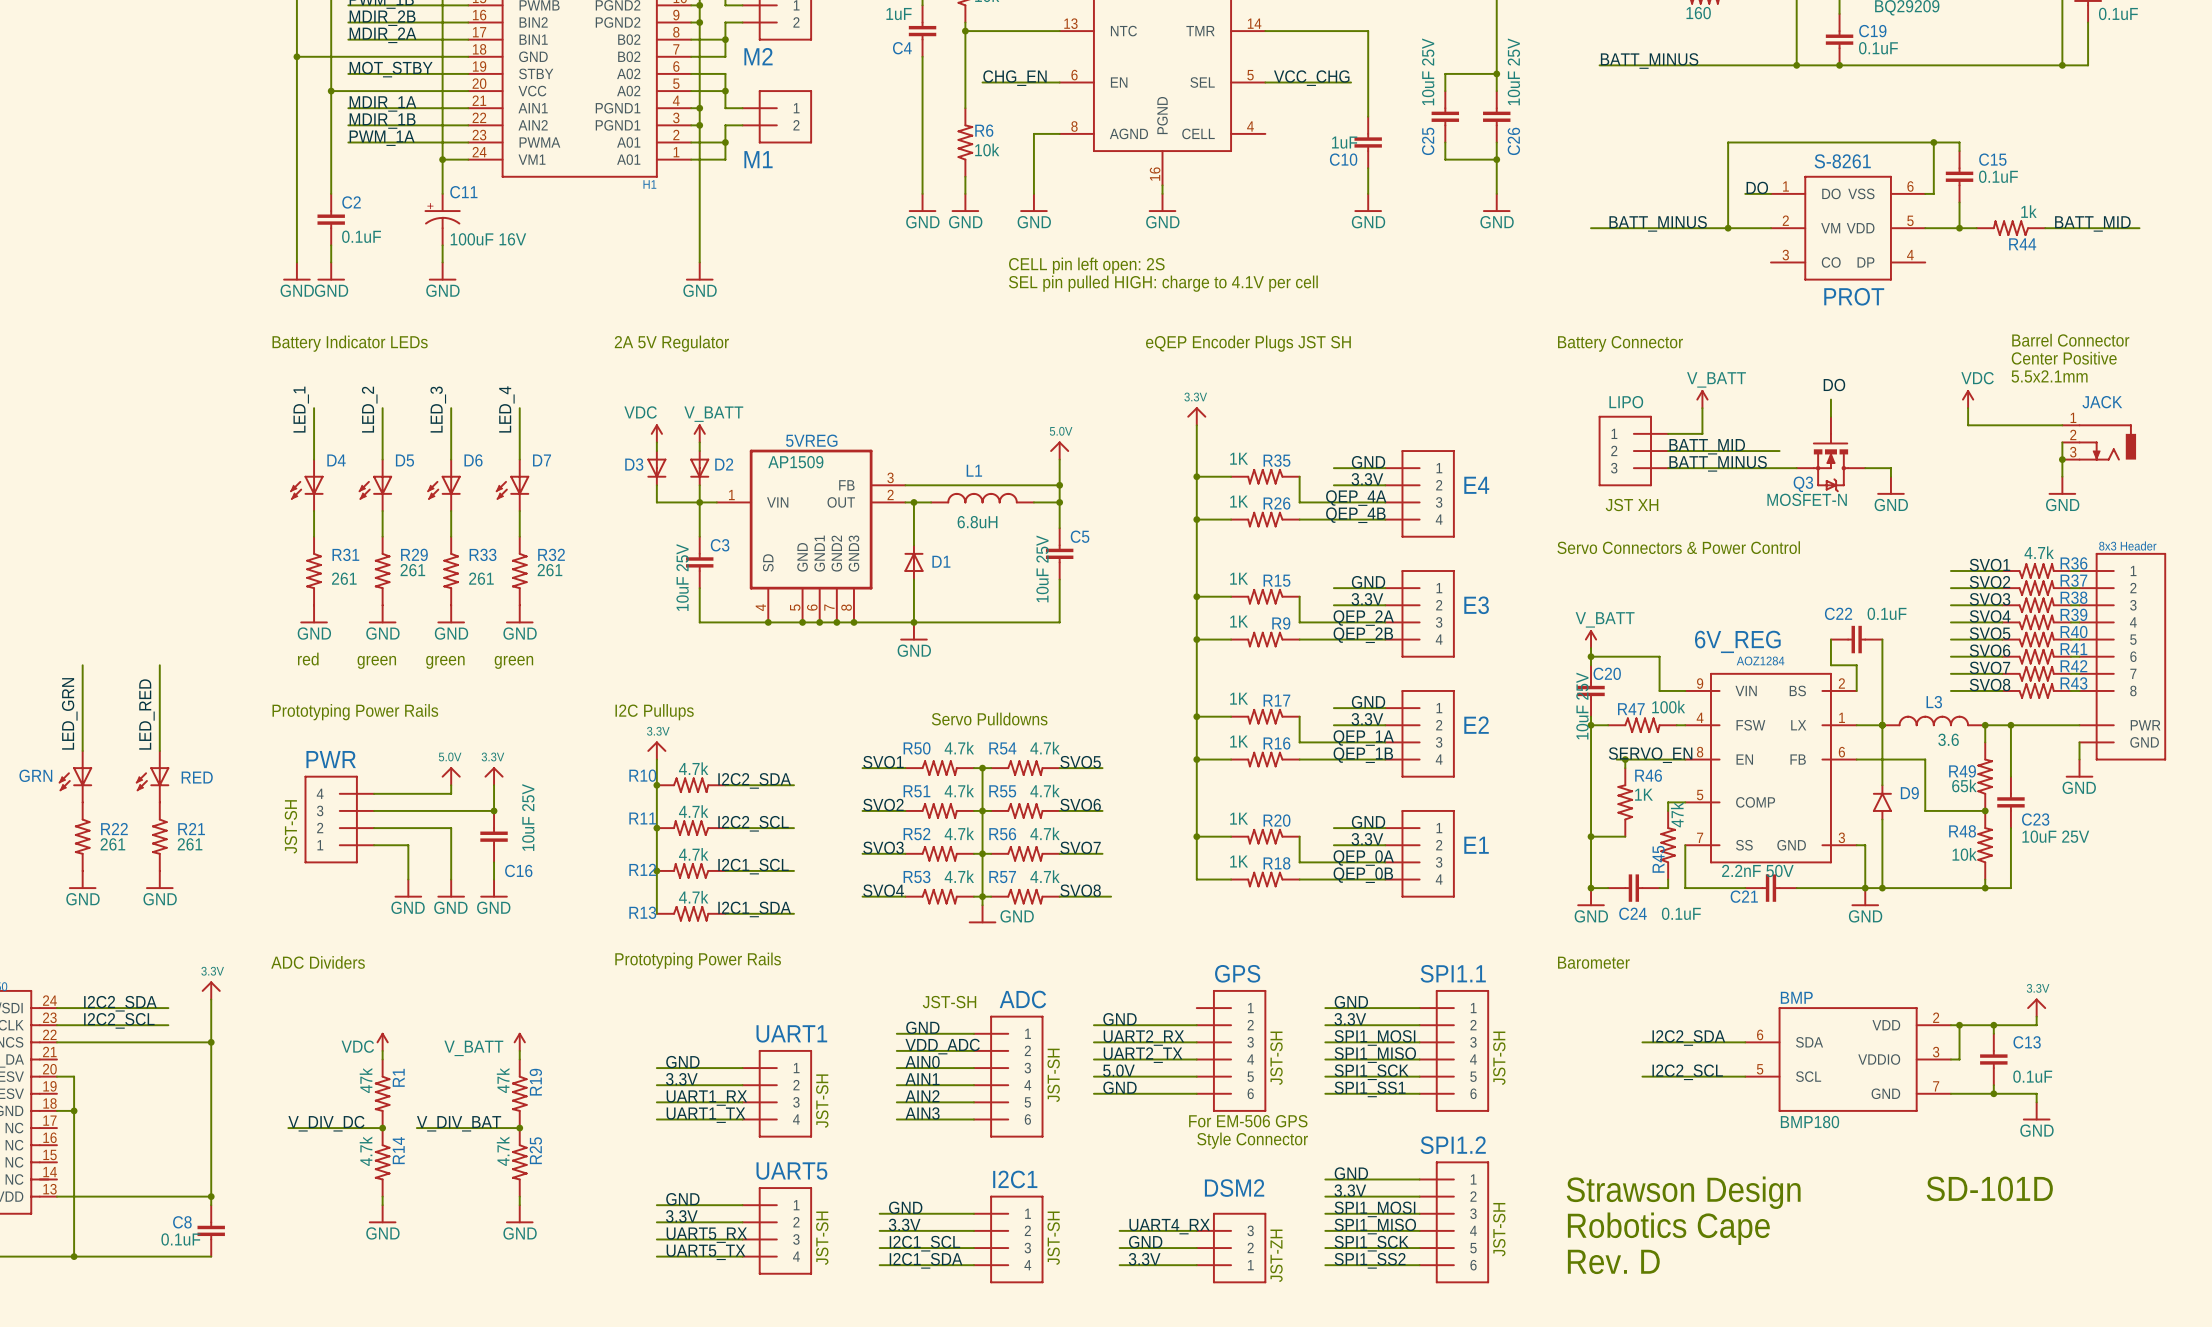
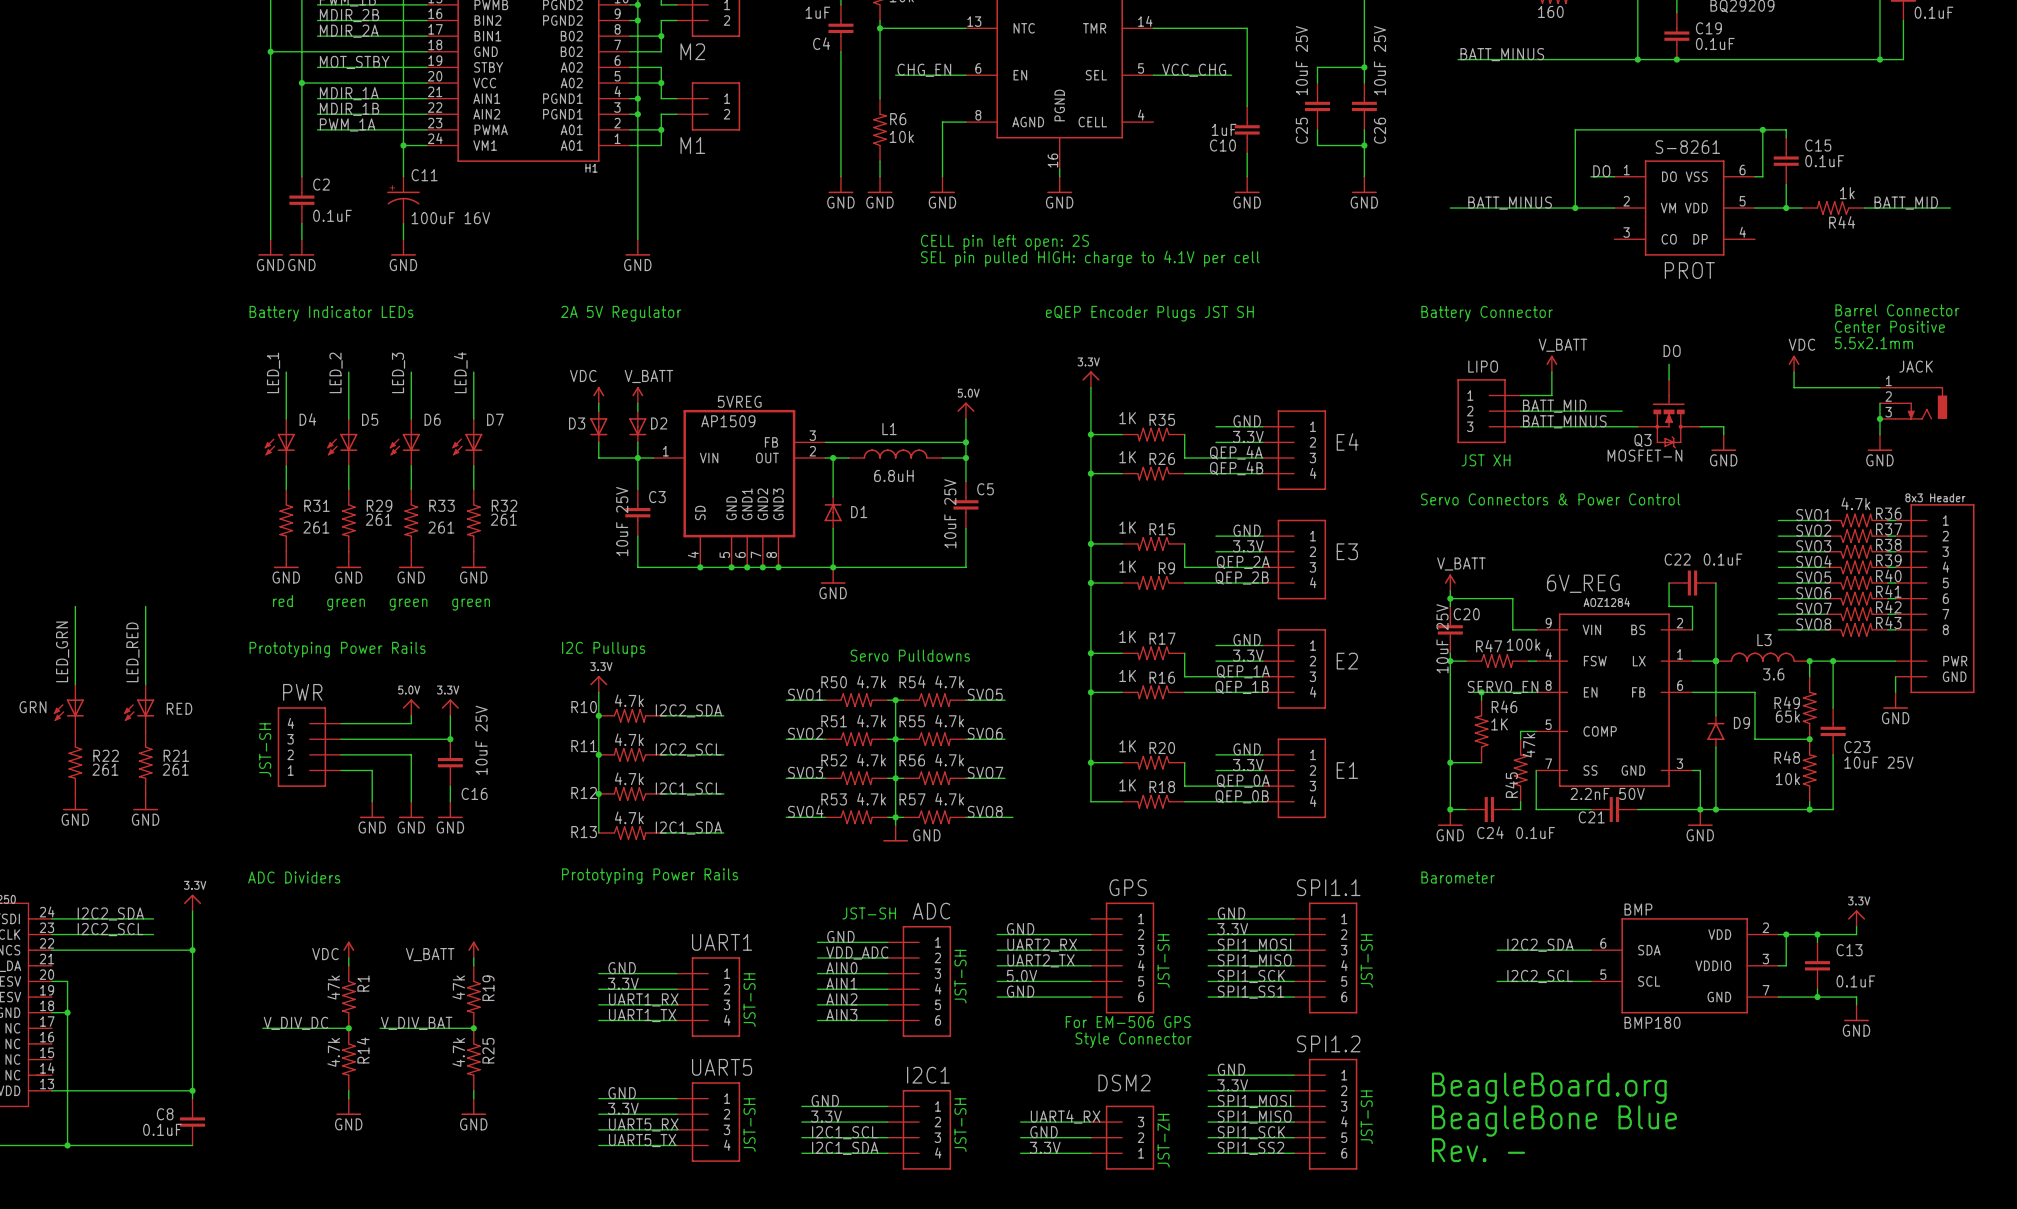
text: SD-101D (1989, 1188) -> none
text: Strawson Design (1683, 1192) -> BeagleBoard.org (1549, 1088)
text: Robotics Cape (1668, 1228) -> BeagleBone Blue (1554, 1121)
text: Rev. D (1613, 1261) -> Rev. - (1478, 1150)

